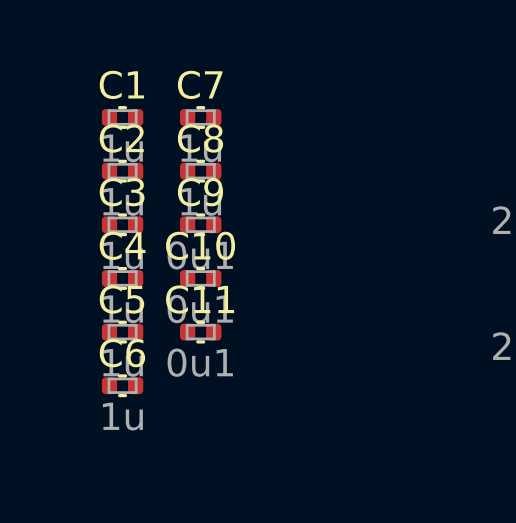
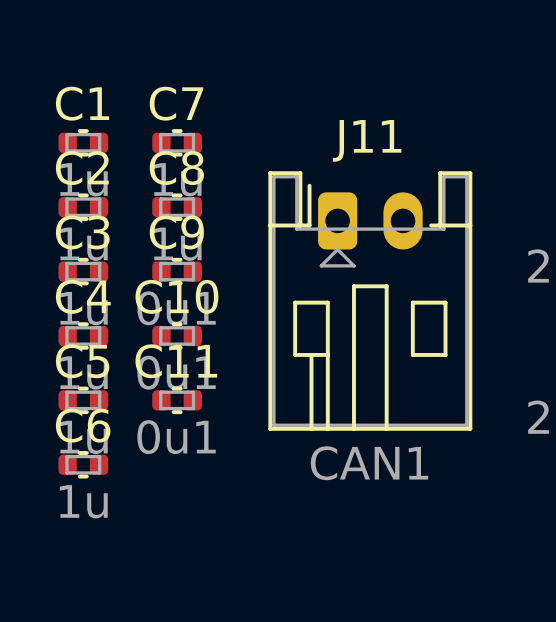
J11: none -> CAN1 (370, 301)

